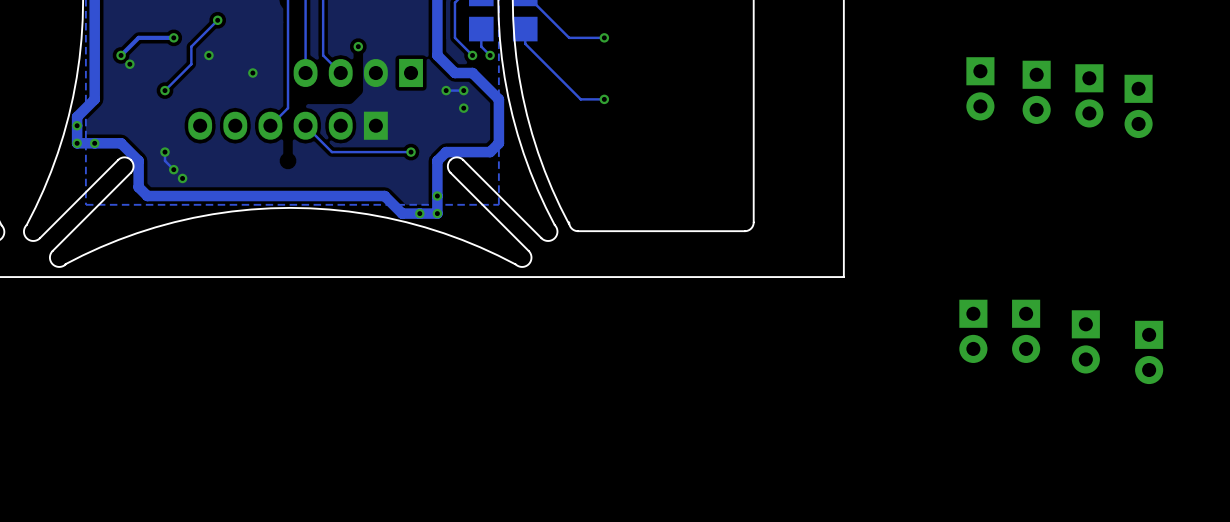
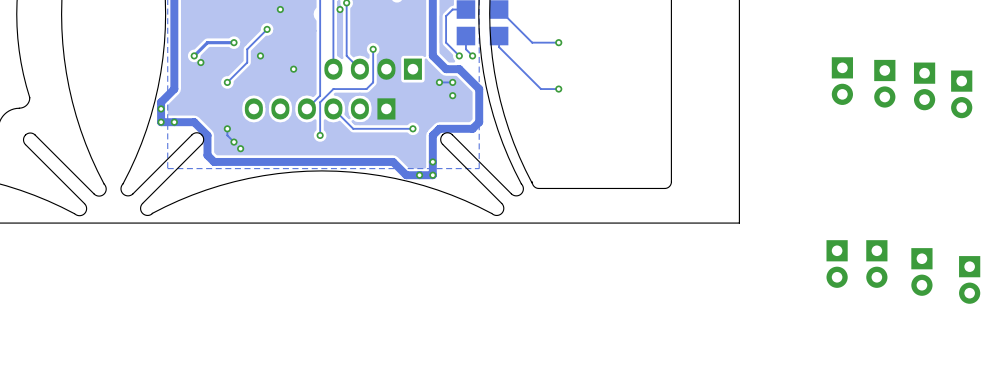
track: none -> (373, 49) (373, 82) (366, 89) (333, 89) (320, 102) (320, 135)
via: none -> (320, 135)

